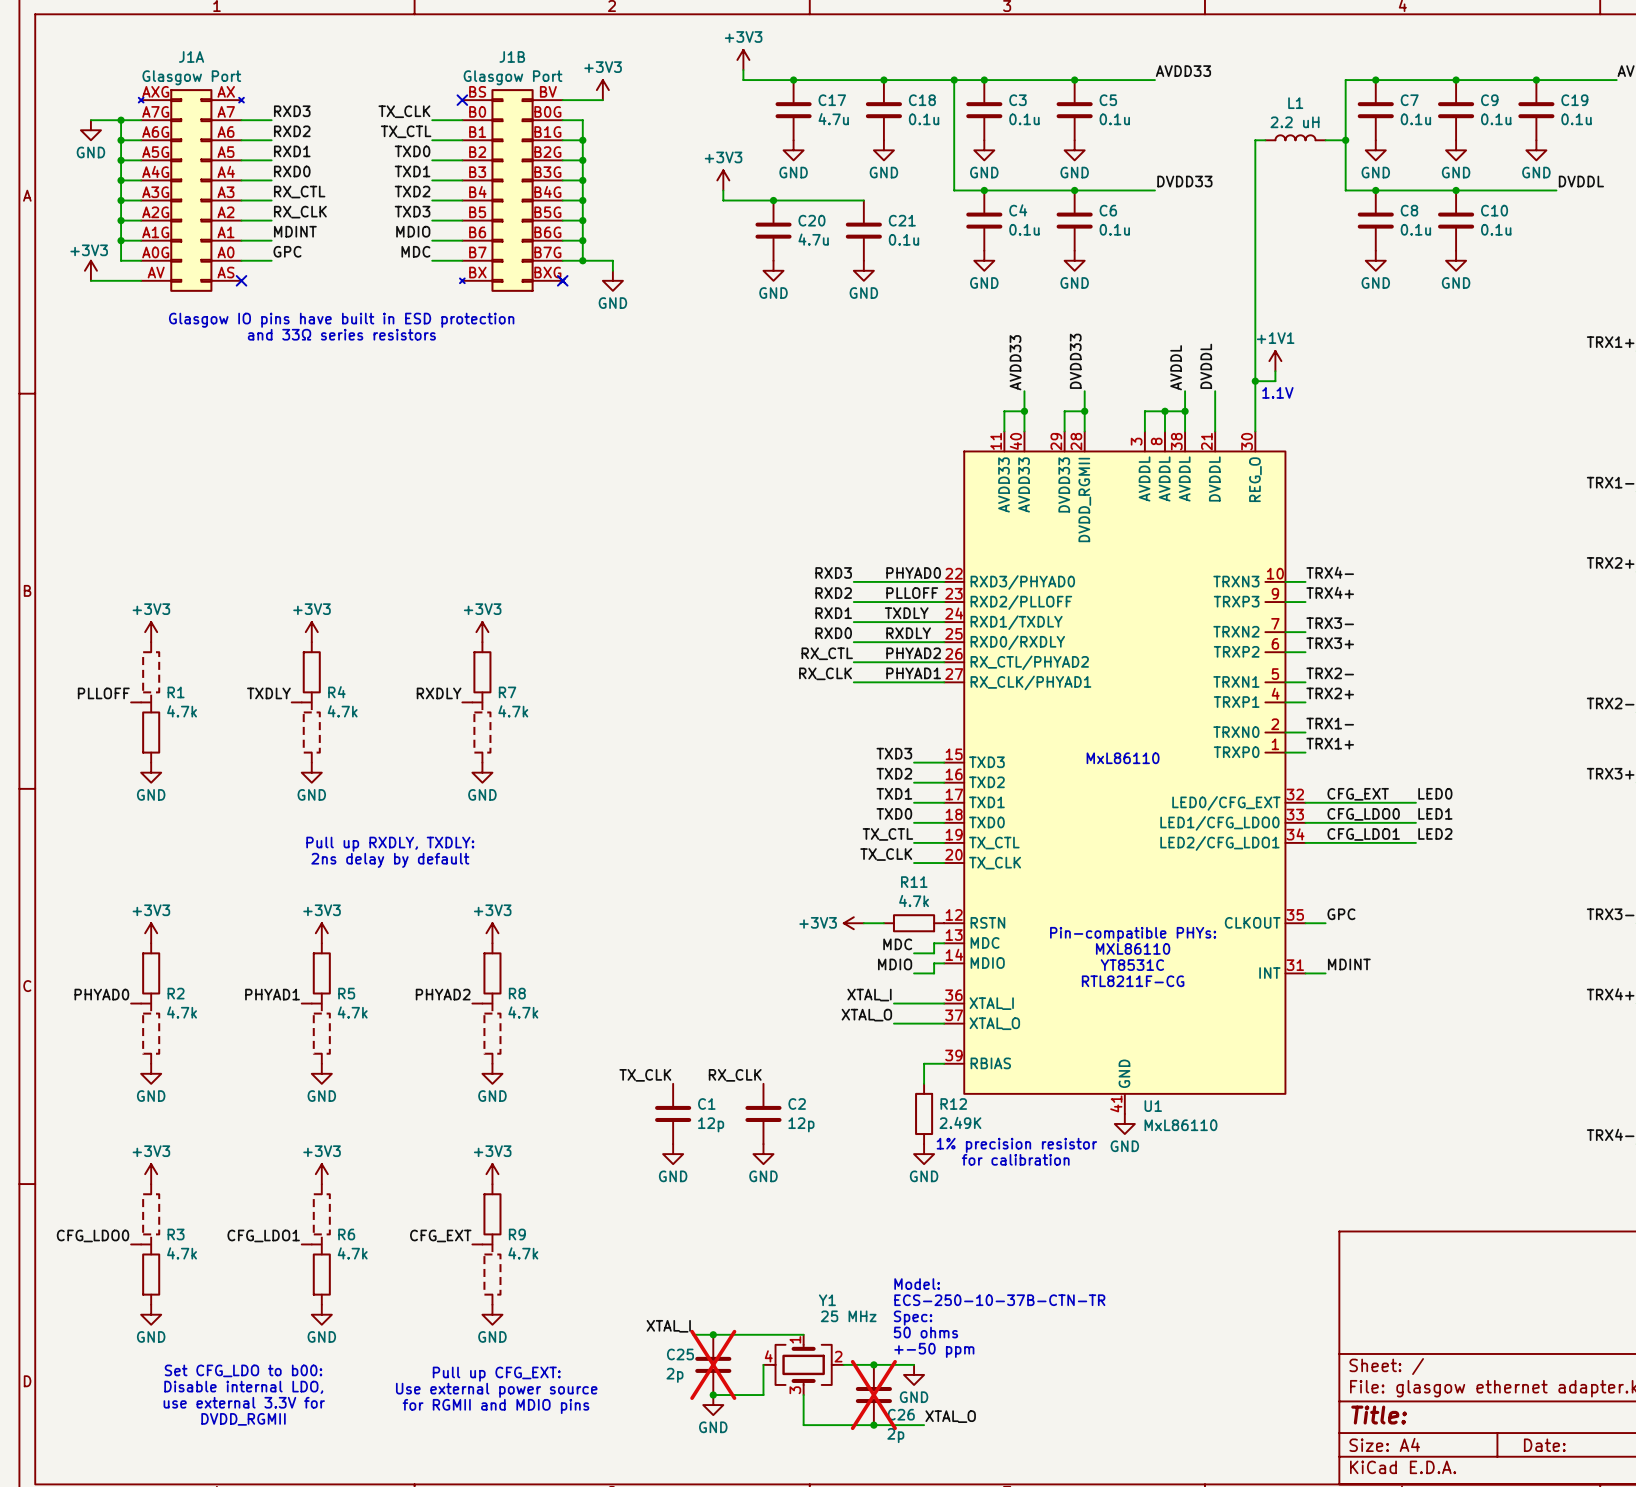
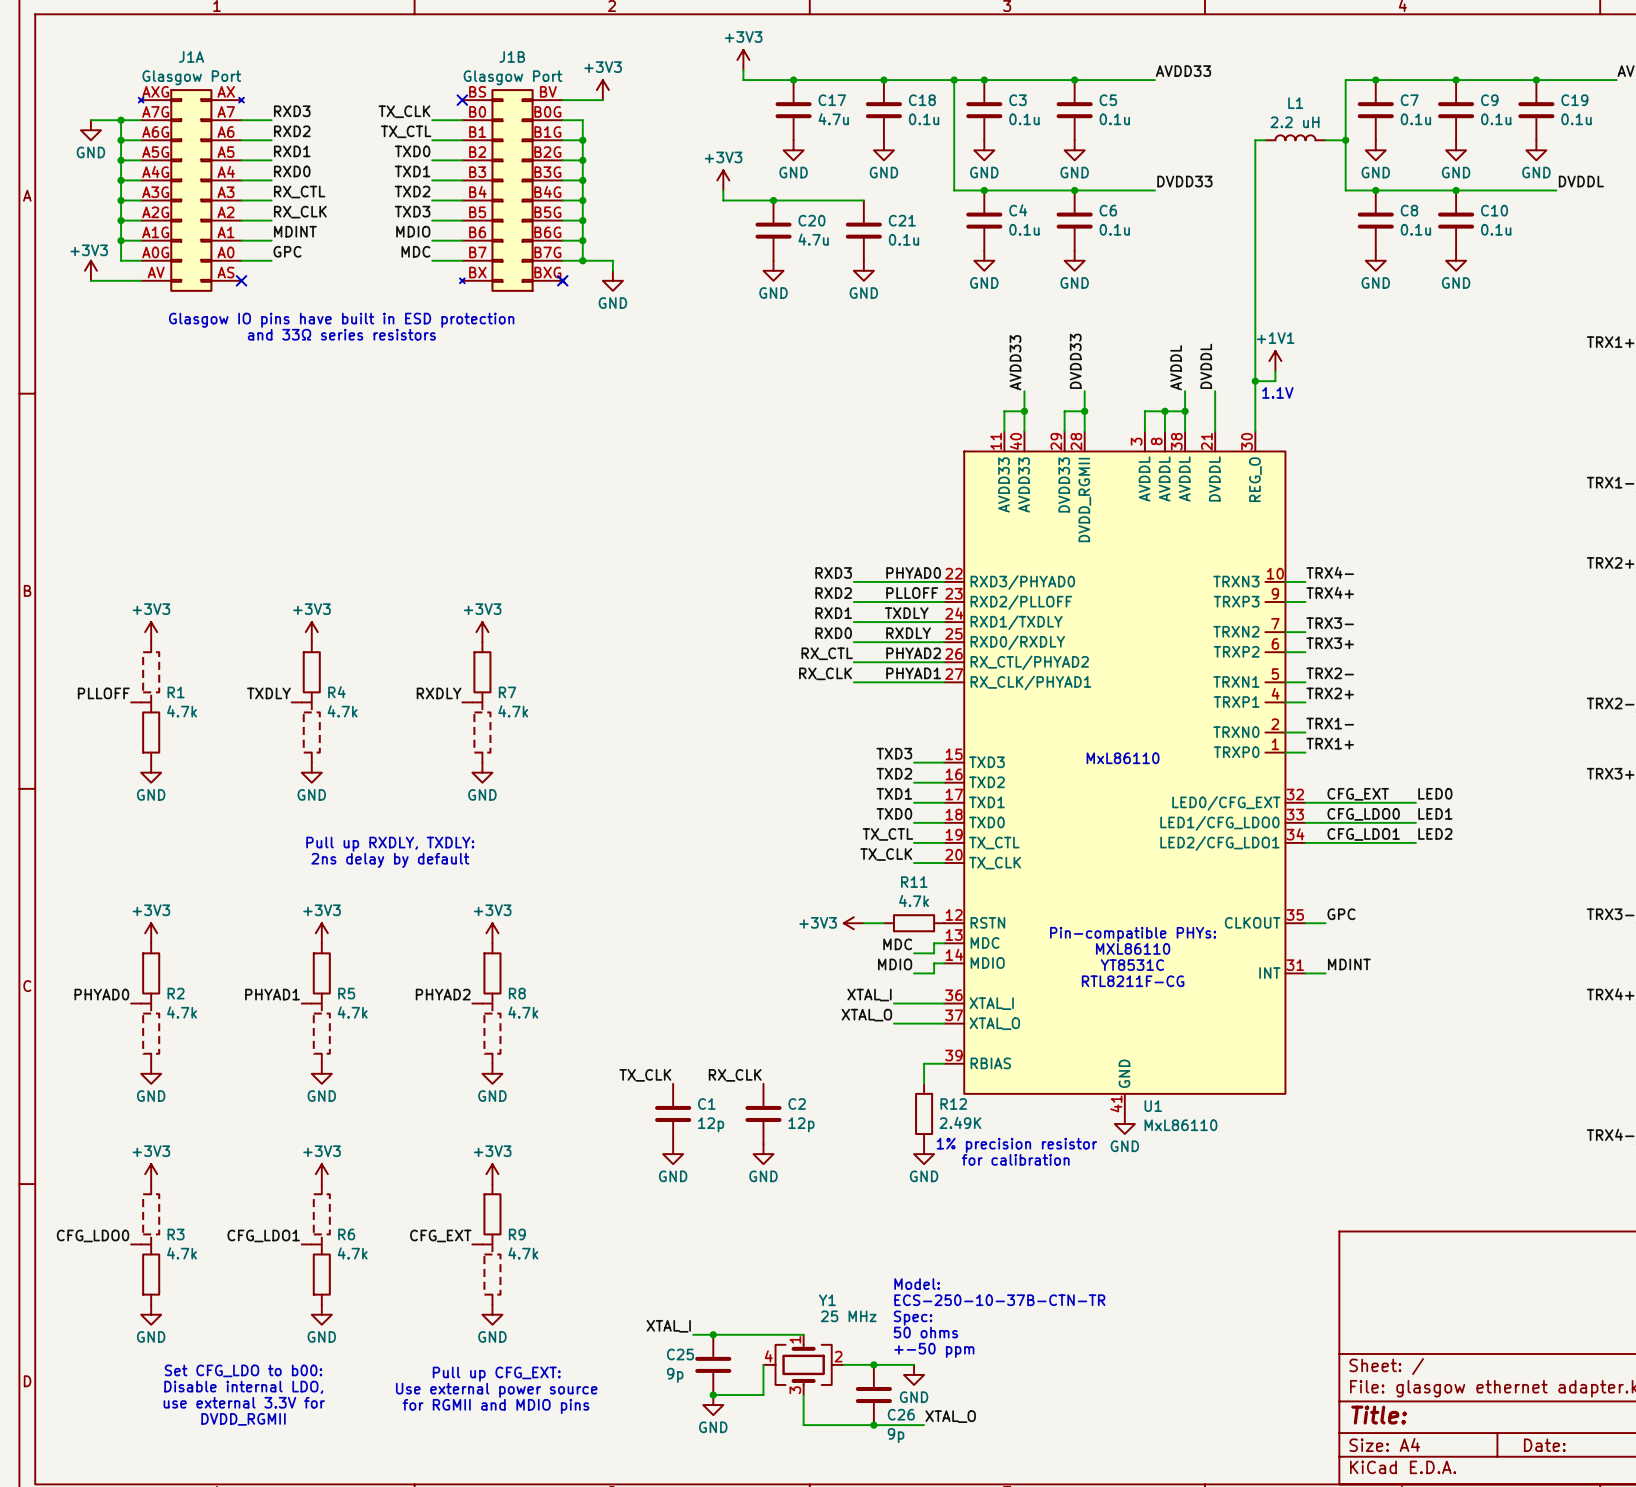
C25 do-not-place cross: (713, 1364) -> none
C25 value: 2p (674, 1375) -> 9p (675, 1375)
C26 do-not-place cross: (873, 1395) -> none
C26 value: 2p (895, 1435) -> 9p (896, 1435)

